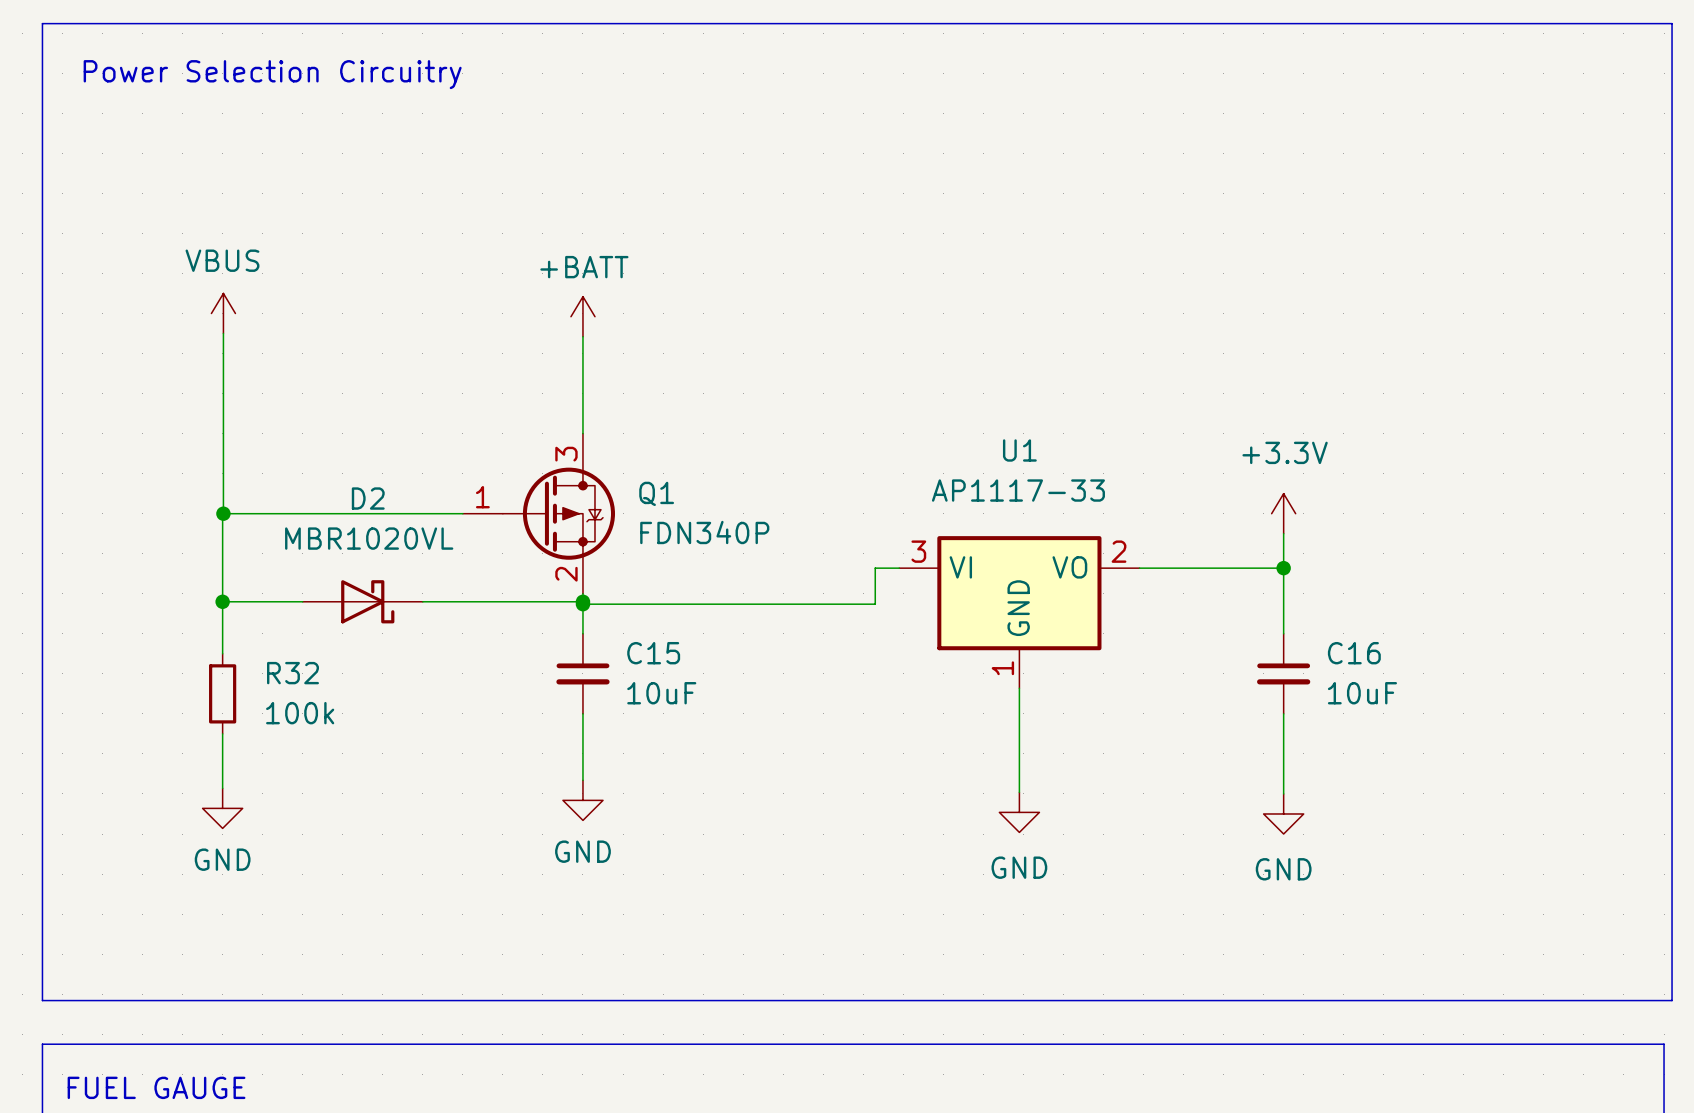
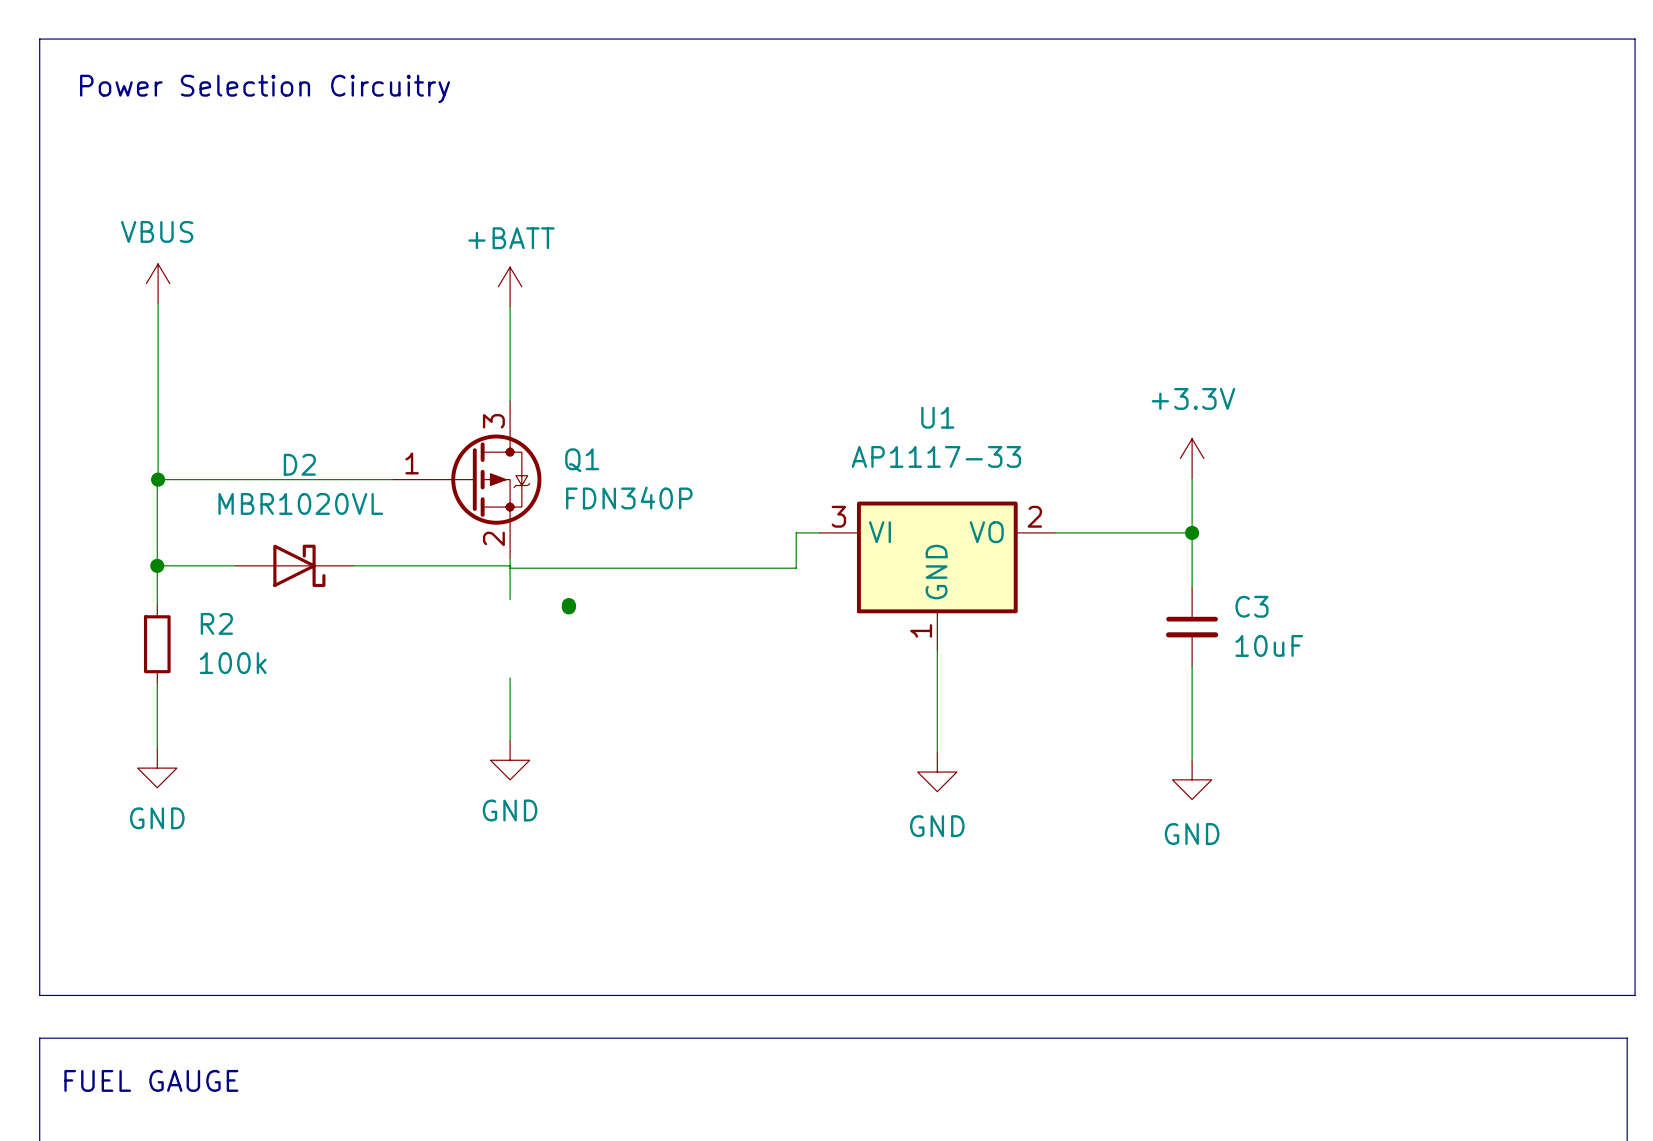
power symbol position: VBUS (223, 313) -> VBUS (158, 283)
power symbol position: +BATT (582, 316) -> +BATT (510, 286)
wire: (223, 333) (223, 513) -> (158, 303) (158, 479)
wire: (582, 336) (582, 433) -> (510, 306) (510, 401)
wire: none -> (1192, 478) (1192, 587)
junction: none -> (158, 479)
wire: none -> (392, 479) (157, 479) (157, 605)
junction: (223, 513) -> none
wire: (462, 513) (222, 513) (222, 653) -> none
Q1 position: (538, 513) -> (466, 479)
power symbol position: +3.3V (1283, 513) -> +3.3V (1192, 458)
wire: none -> (1054, 532) (1192, 532)
wire: (1283, 533) (1283, 633) -> none
wire: none -> (510, 558) (510, 599)
junction: none -> (157, 565)
wire: (899, 568) (875, 568) (875, 604) (582, 604) -> (819, 532) (796, 532) (796, 568) (510, 568)
wire: (1139, 568) (1283, 568) -> none
junction position: (1283, 568) -> (1192, 532)
wire: (582, 593) (582, 633) -> none
wire: (222, 601) (302, 601) -> (157, 565) (235, 565)
junction: (222, 601) -> none
D2 position: (362, 601) -> (294, 565)
wire: (422, 601) (582, 601) -> (353, 565) (510, 565)
U1 position: (1019, 612) -> (937, 576)
C3: none -> 10uF (1192, 627)
R2: none -> 100k (157, 644)
wire: none -> (1192, 666) (1192, 760)
C15: 10uF (582, 673) -> none
C16: 10uF (1283, 673) -> none
wire: none -> (510, 677) (510, 740)
wire: none -> (157, 683) (157, 748)
wire: (1019, 688) (1019, 792) -> (937, 650) (937, 752)
R32: 100k (222, 693) -> none
wire: (582, 713) (582, 780) -> none
wire: (1283, 713) (1283, 793) -> none
wire: (222, 733) (222, 788) -> none
power symbol position: GND (582, 800) -> GND (510, 760)
power symbol position: GND (222, 808) -> GND (157, 768)
power symbol position: GND (1019, 812) -> GND (937, 772)
power symbol position: GND (1283, 813) -> GND (1192, 779)

